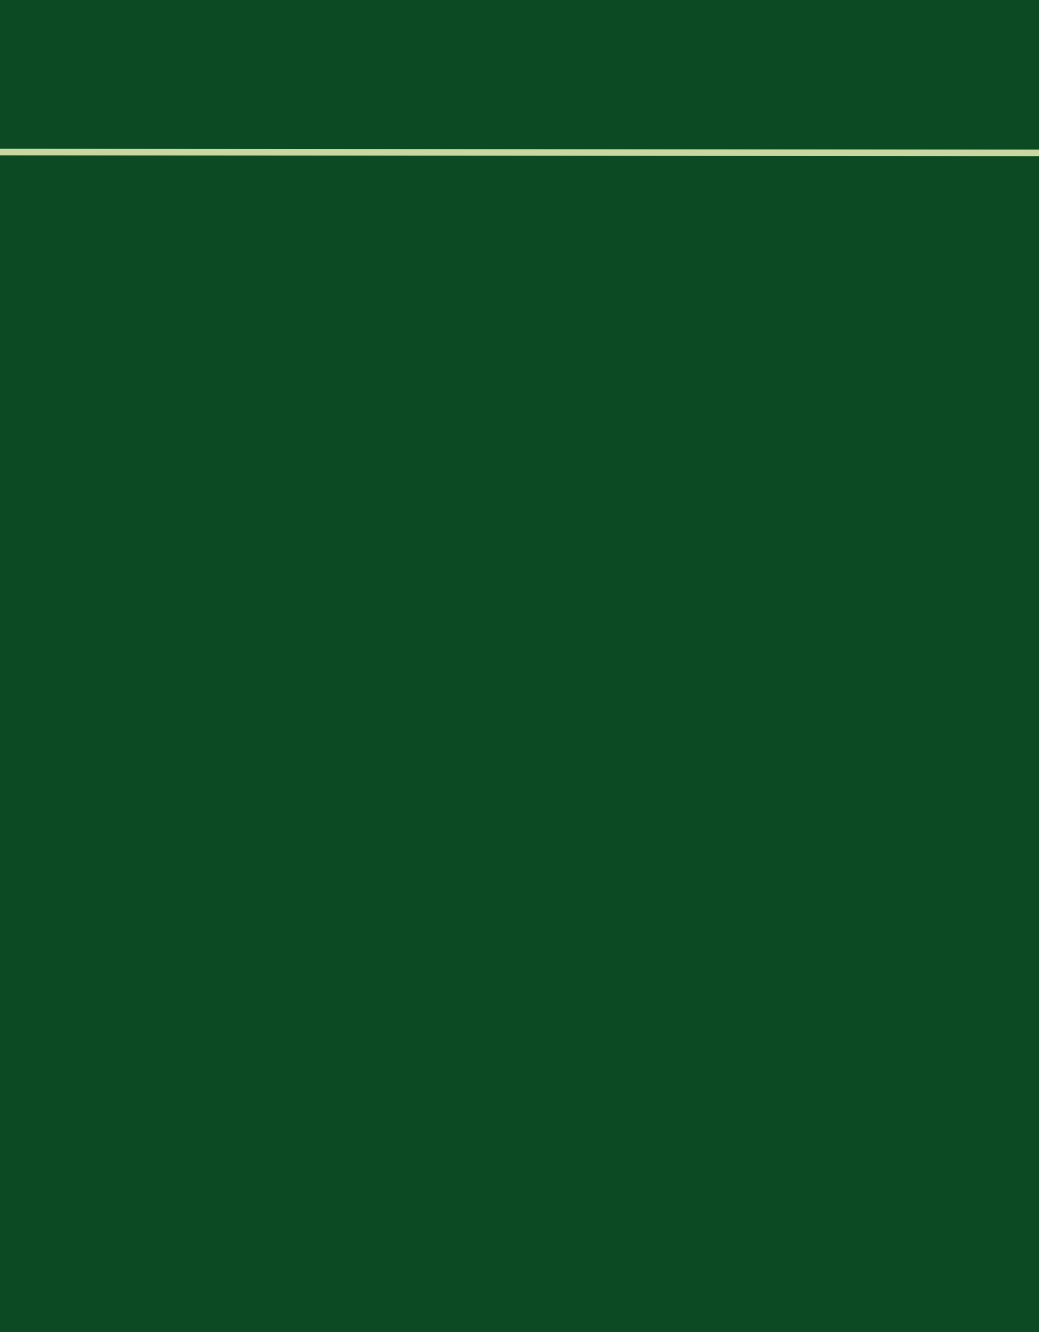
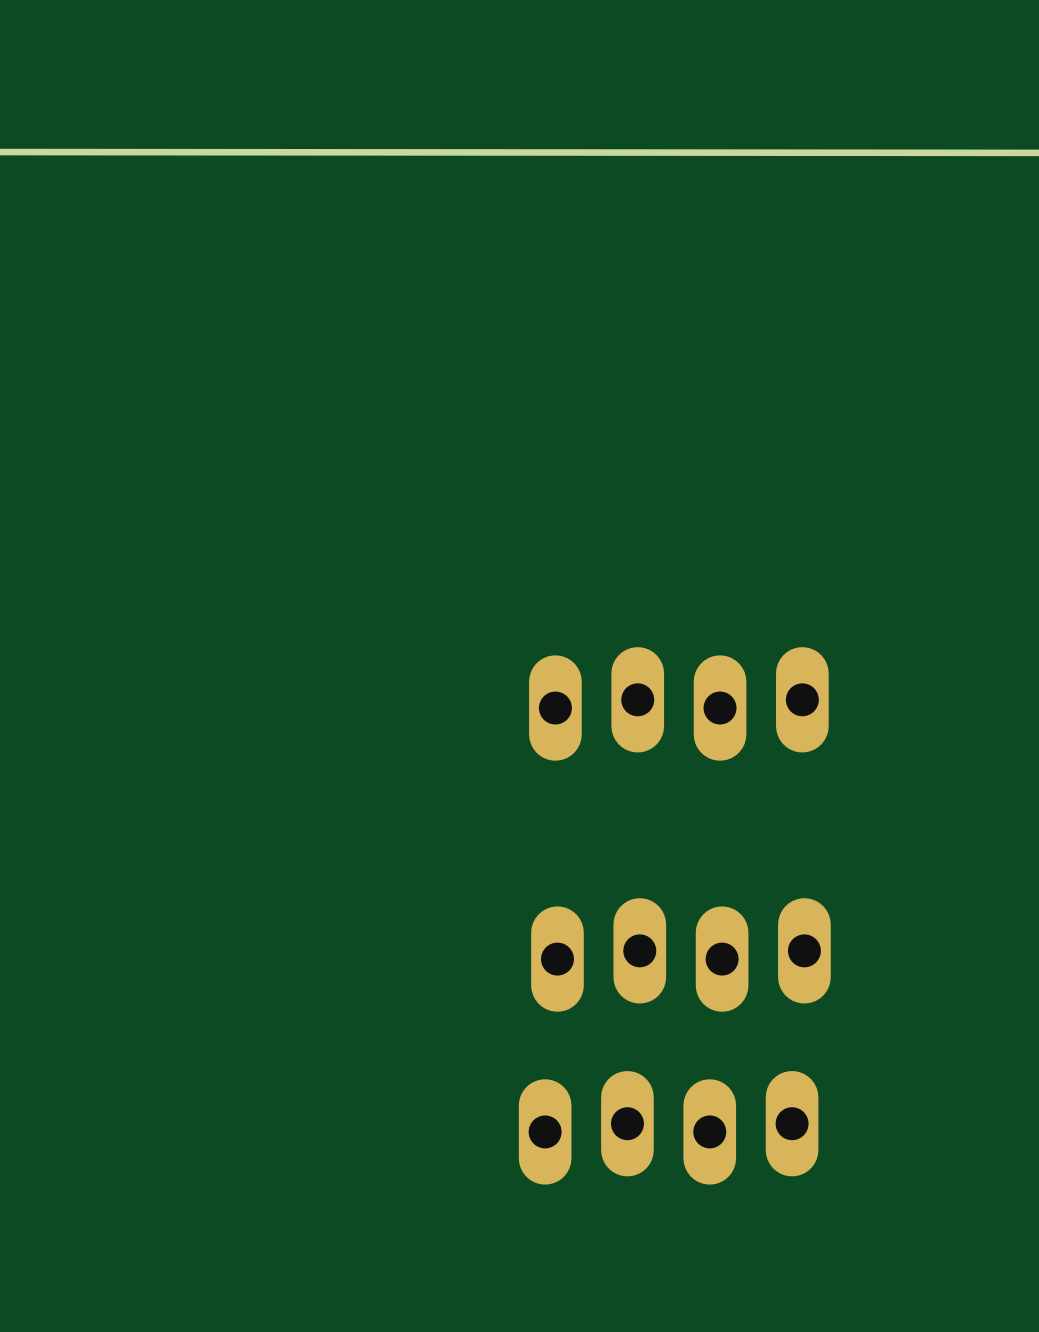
part: none -> (678, 703)
part: none -> (680, 954)
part: none -> (668, 1127)

